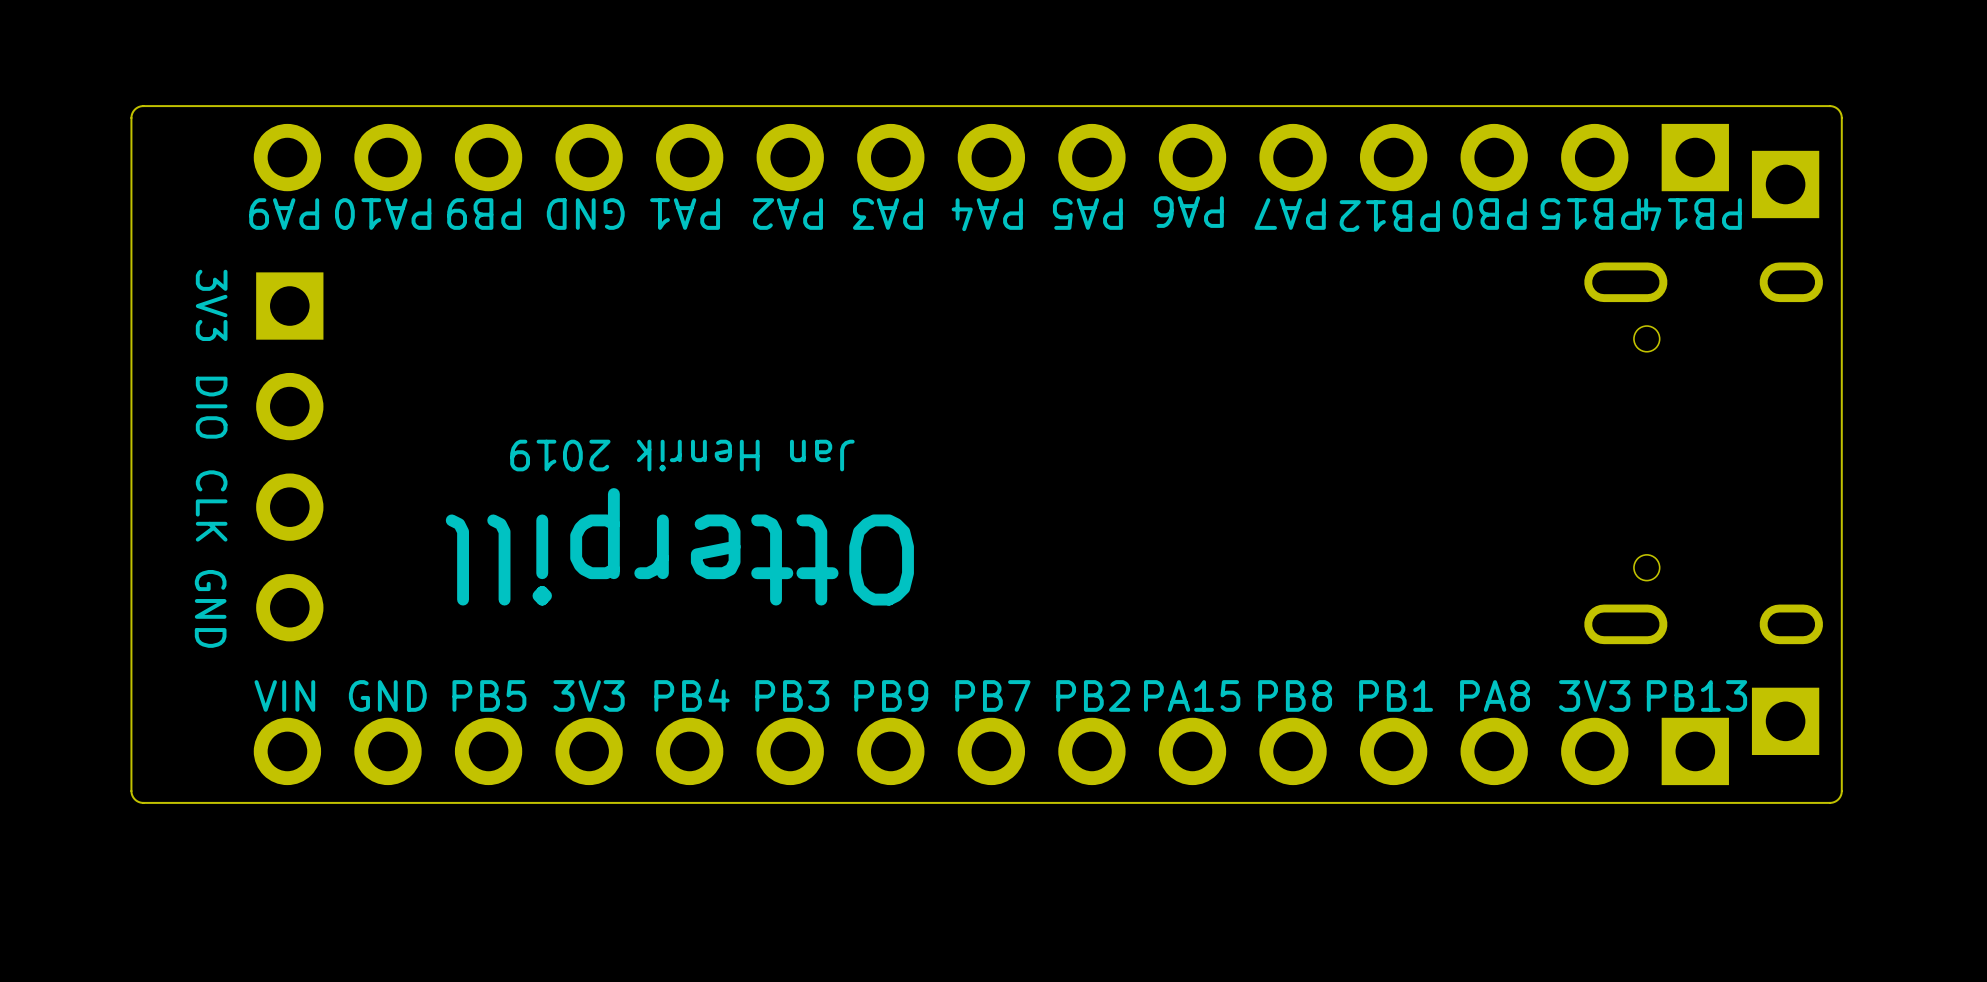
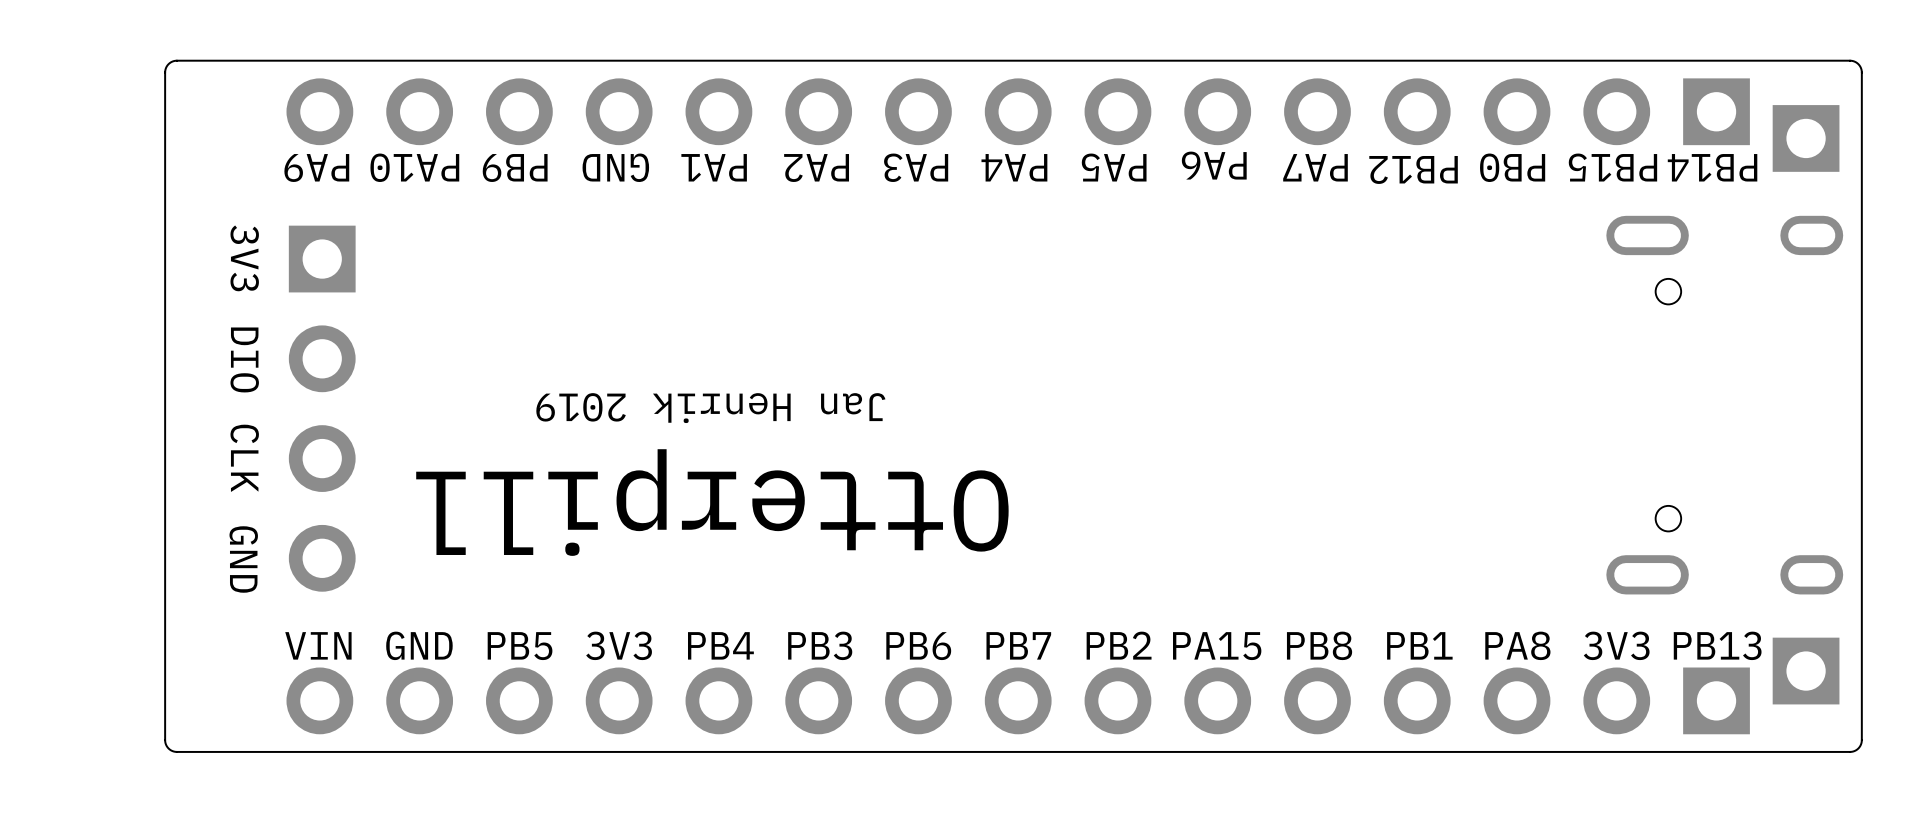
text: PB9 (891, 695) -> PB6 (918, 646)

